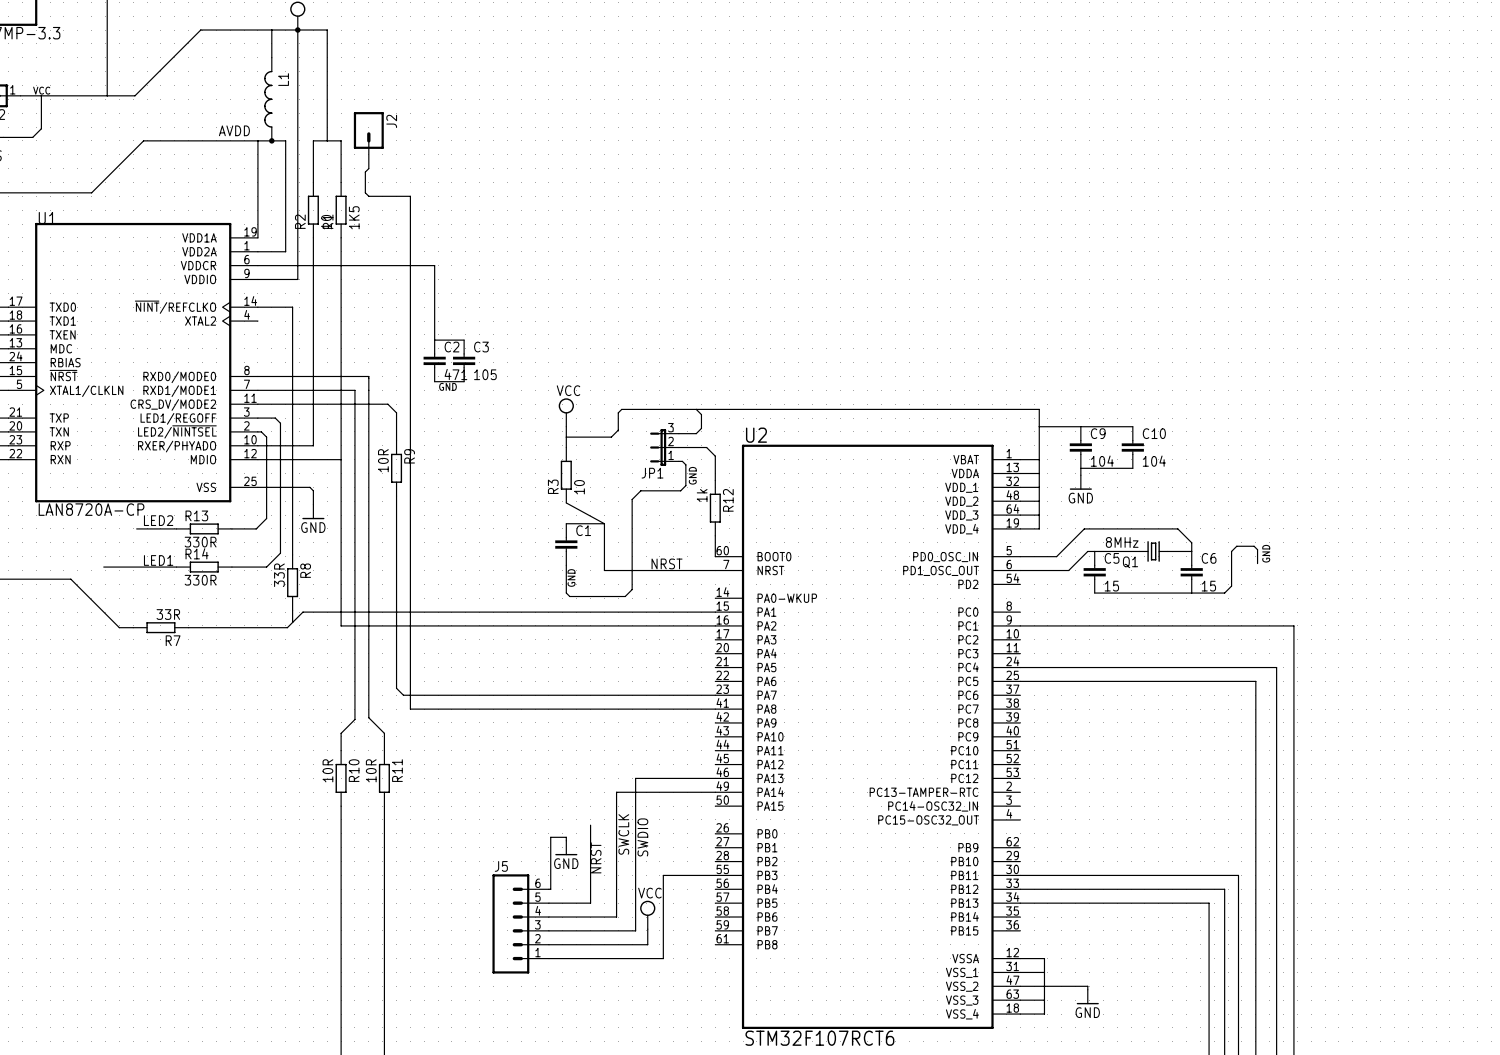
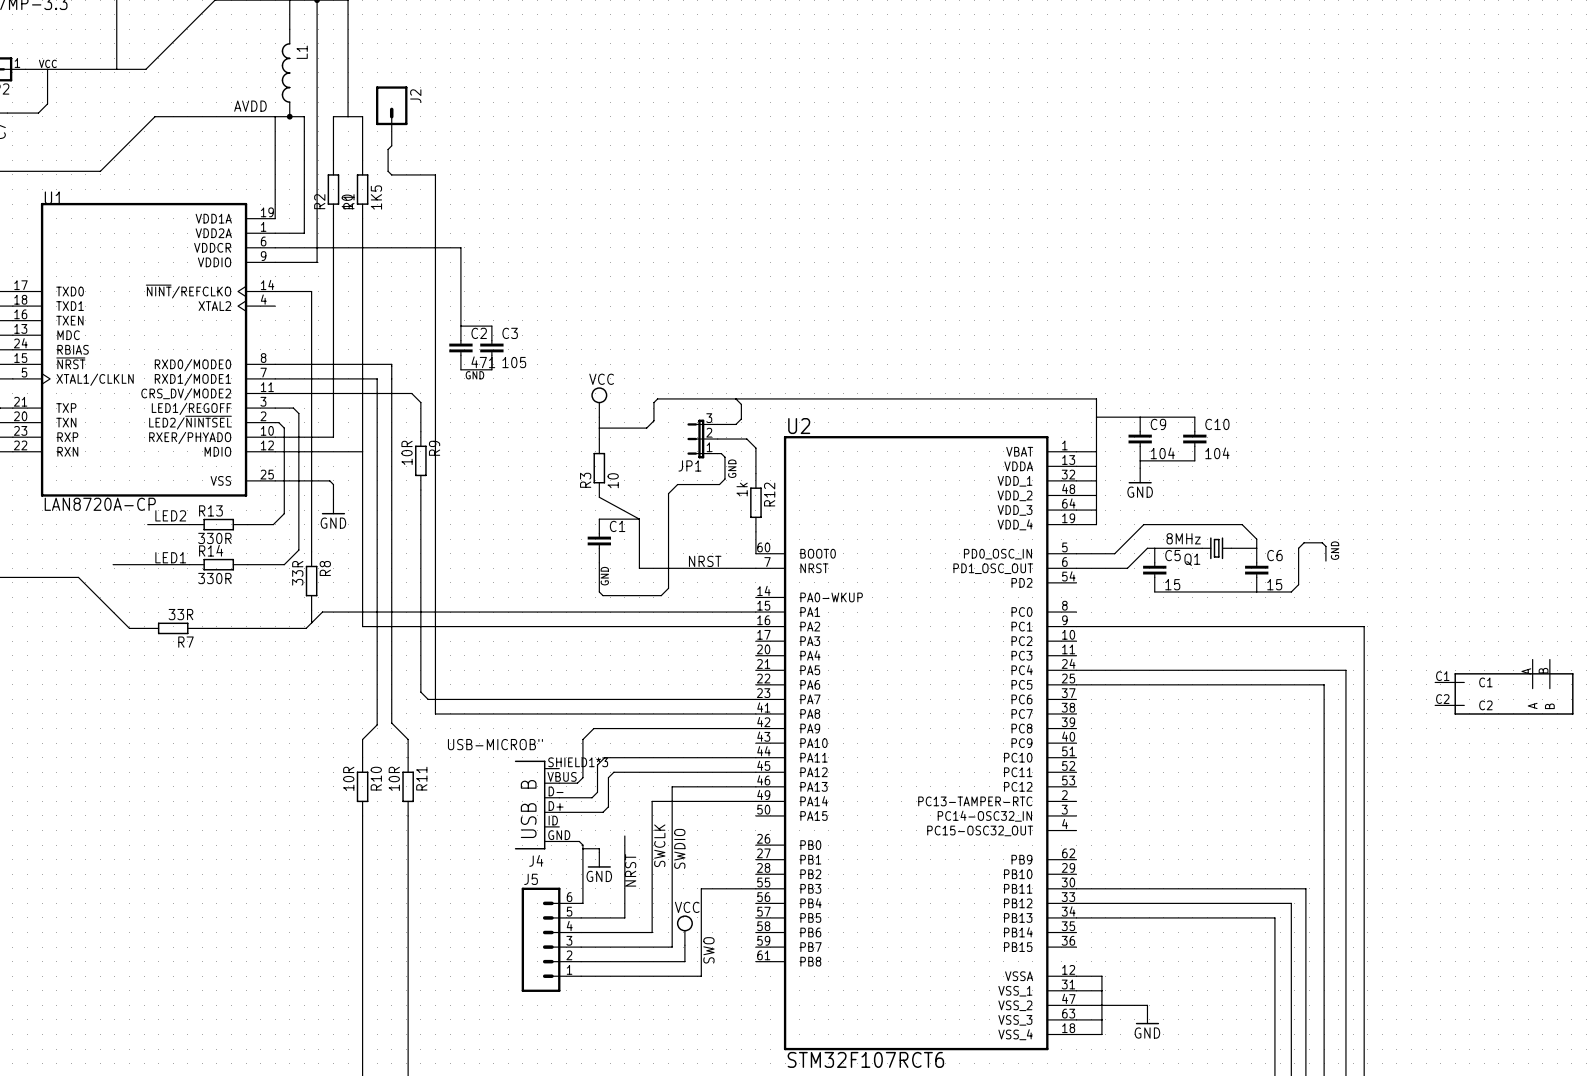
part: none -> (1504, 687)
wire: none -> (755, 728) (593, 728) (582, 739) (582, 777) (577, 783) (559, 783)
wire: none -> (755, 757) (604, 757) (597, 764) (597, 792) (592, 797) (559, 797)
wire: none -> (755, 772) (613, 772) (608, 777) (608, 806) (602, 812) (559, 812)
J4: none -> USB-MICROB" (537, 805)
wire: none -> (559, 841) (579, 841) (582, 845) (582, 848)
label: none -> SWO (708, 950)

